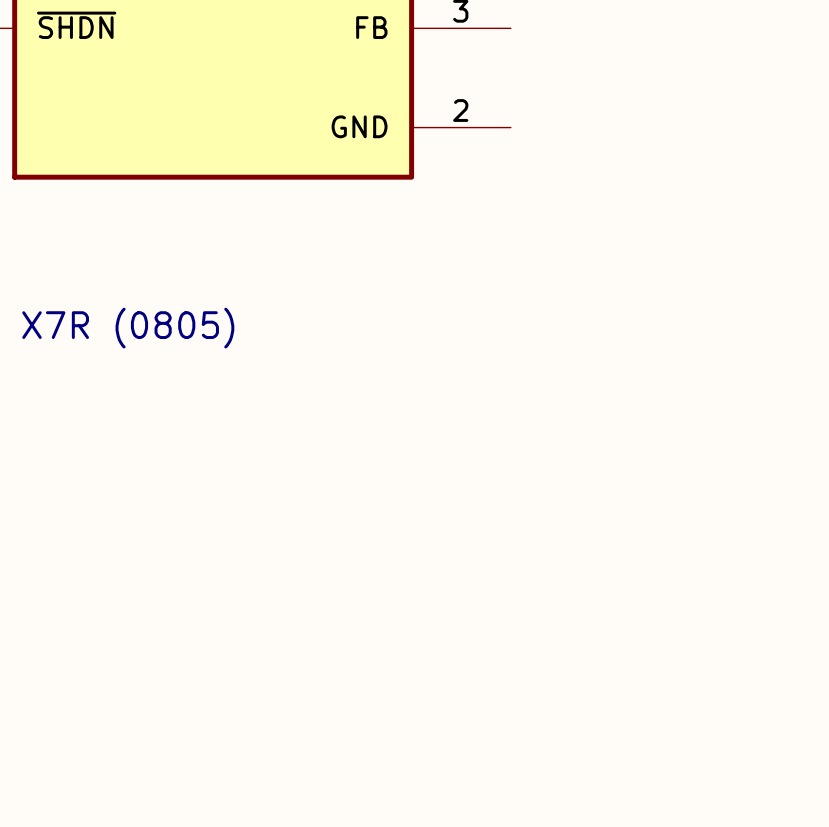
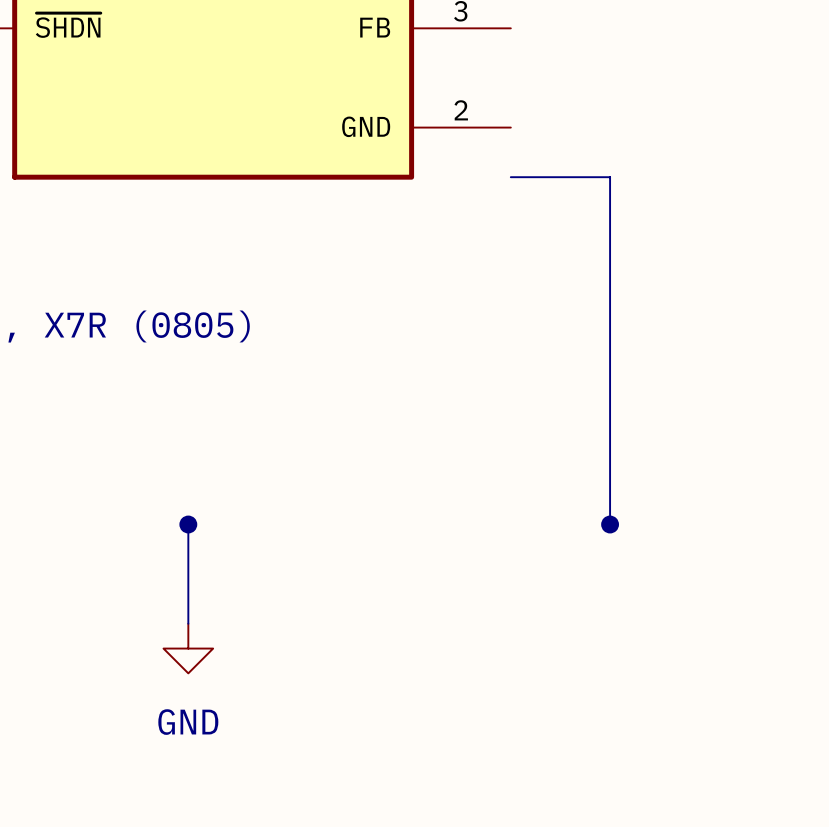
wire: none -> (510, 177) (610, 177) (610, 524)
wire: none -> (188, 524) (188, 623)
junction: none -> (188, 524)
junction: none -> (610, 524)
power symbol: none -> GND (188, 648)

